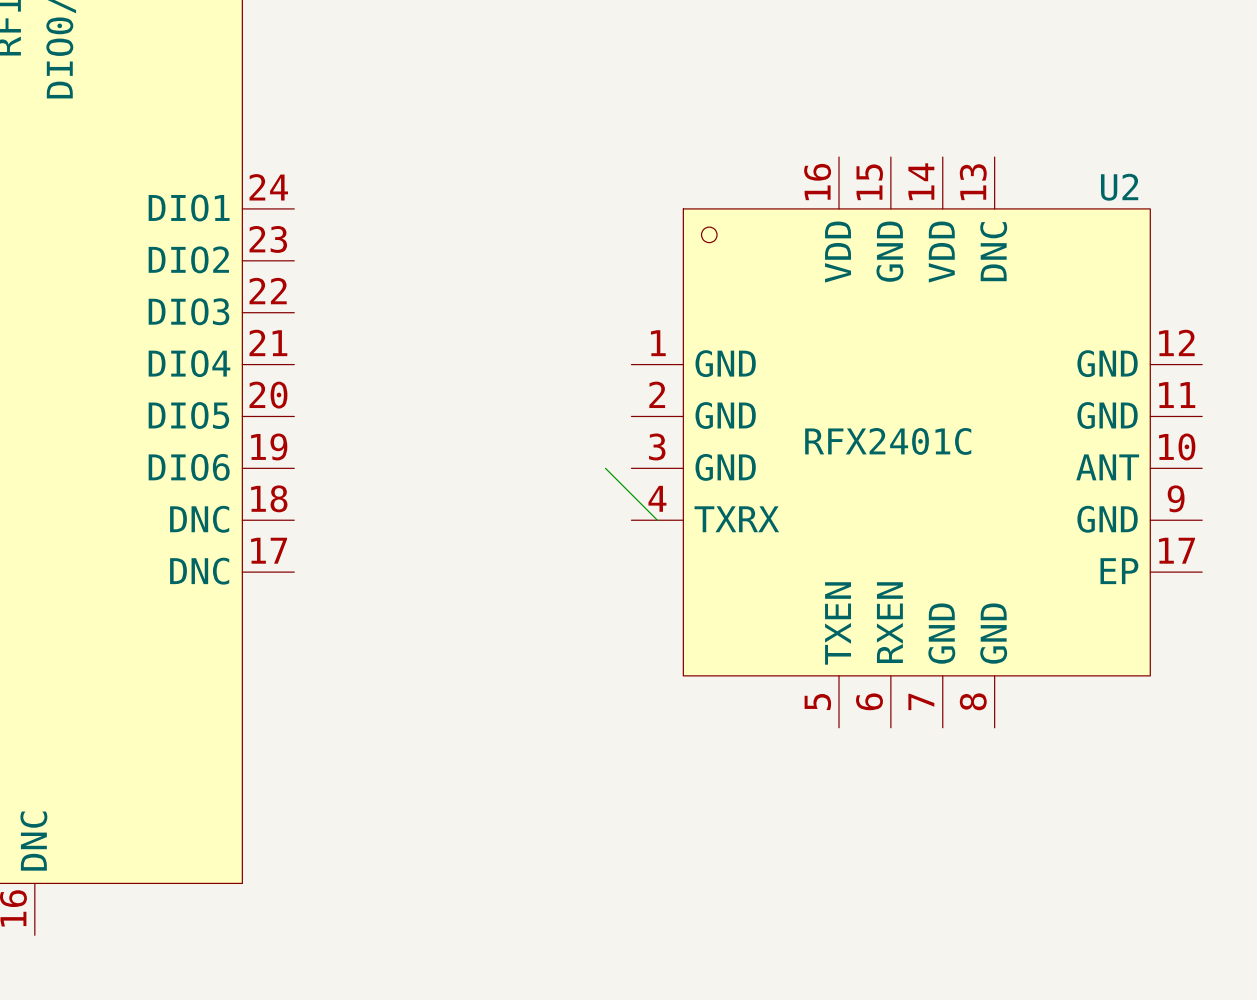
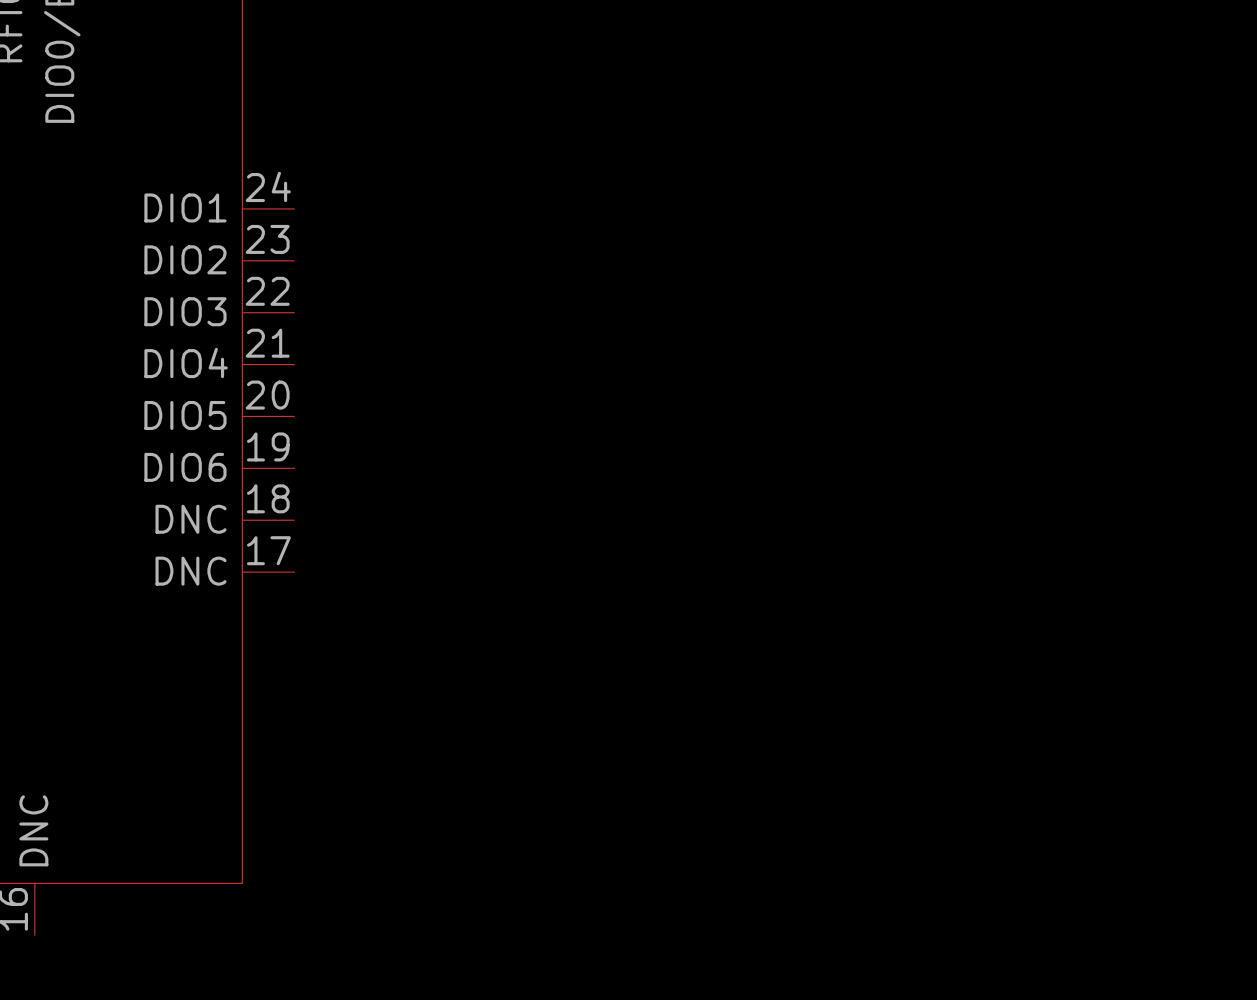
U2: RFX2401C (916, 442) -> none
wire: (605, 468) (657, 520) -> none

